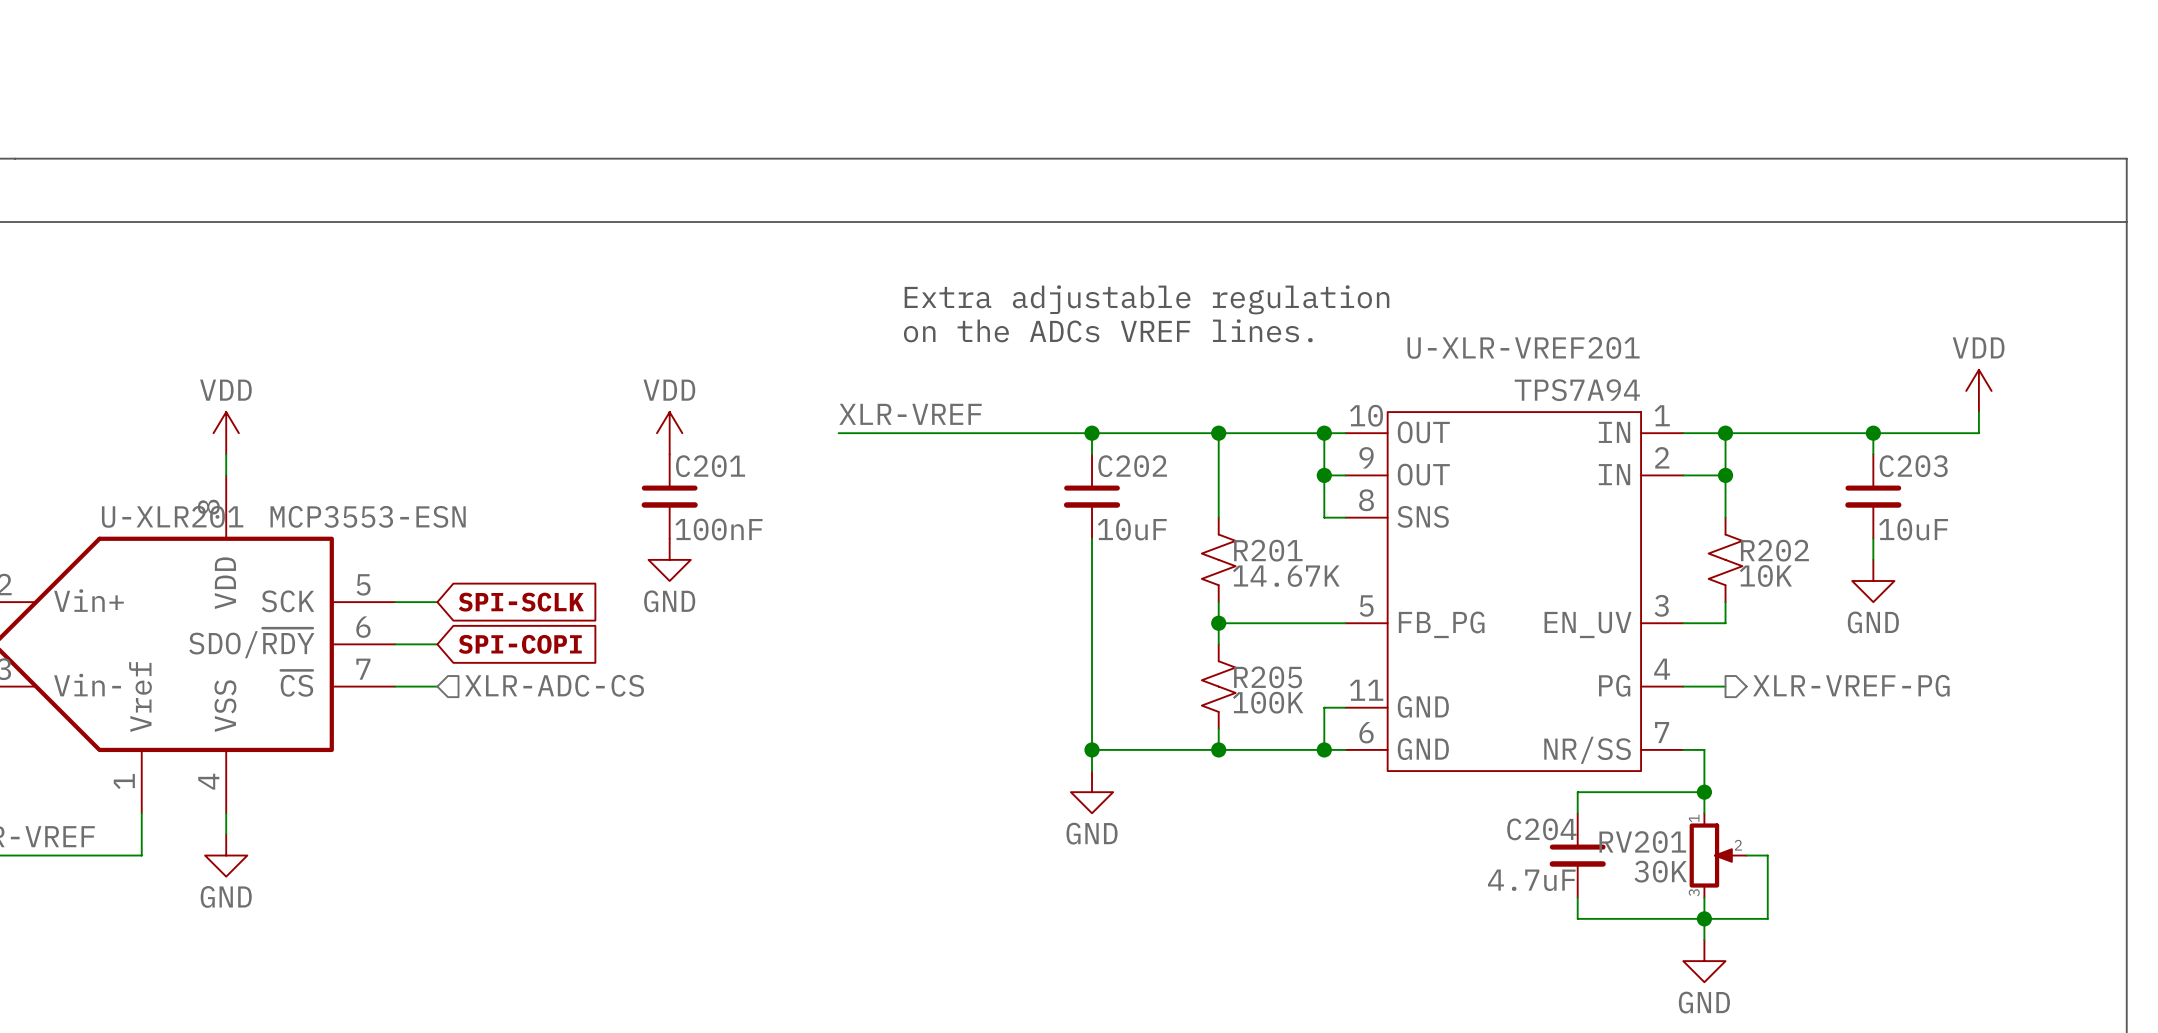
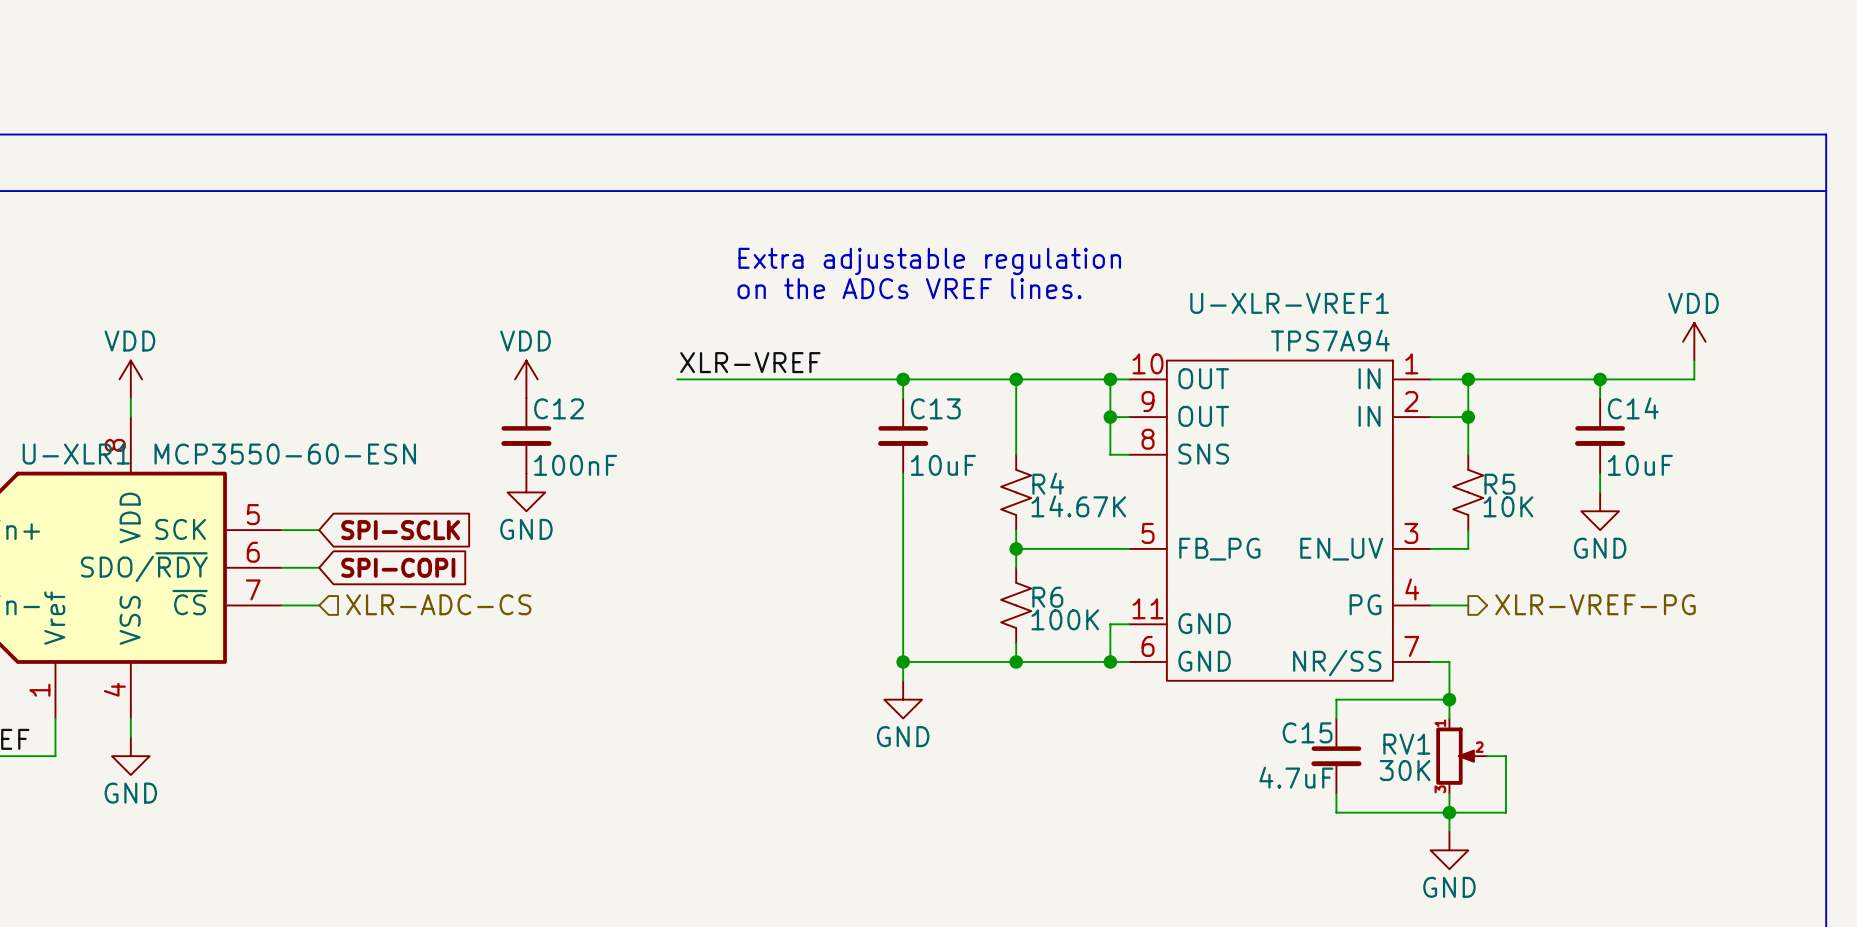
U-XLR-VREF201 name: U-XLR-VREF201 (1523, 347) -> U-XLR-VREF1 (1289, 303)
C201 name: C201 (710, 466) -> C12 (559, 408)
C202 name: C202 (1132, 466) -> C13 (935, 408)
C203 name: C203 (1913, 466) -> C14 (1633, 408)
U-XLR201 name: U-XLR201 (172, 516) -> U-XLR1 (76, 454)
U-XLR201 value: MCP3553-ESN (368, 516) -> MCP3550-60-ESN (285, 454)
R201 name: R201 (1268, 550) -> R4 (1048, 483)
R202 name: R202 (1774, 550) -> R5 (1499, 484)
R205 name: R205 (1268, 677) -> R6 (1047, 597)
C204 name: C204 (1541, 829) -> C15 (1307, 732)
RV201 name: RV201 (1642, 842) -> RV1 (1406, 744)

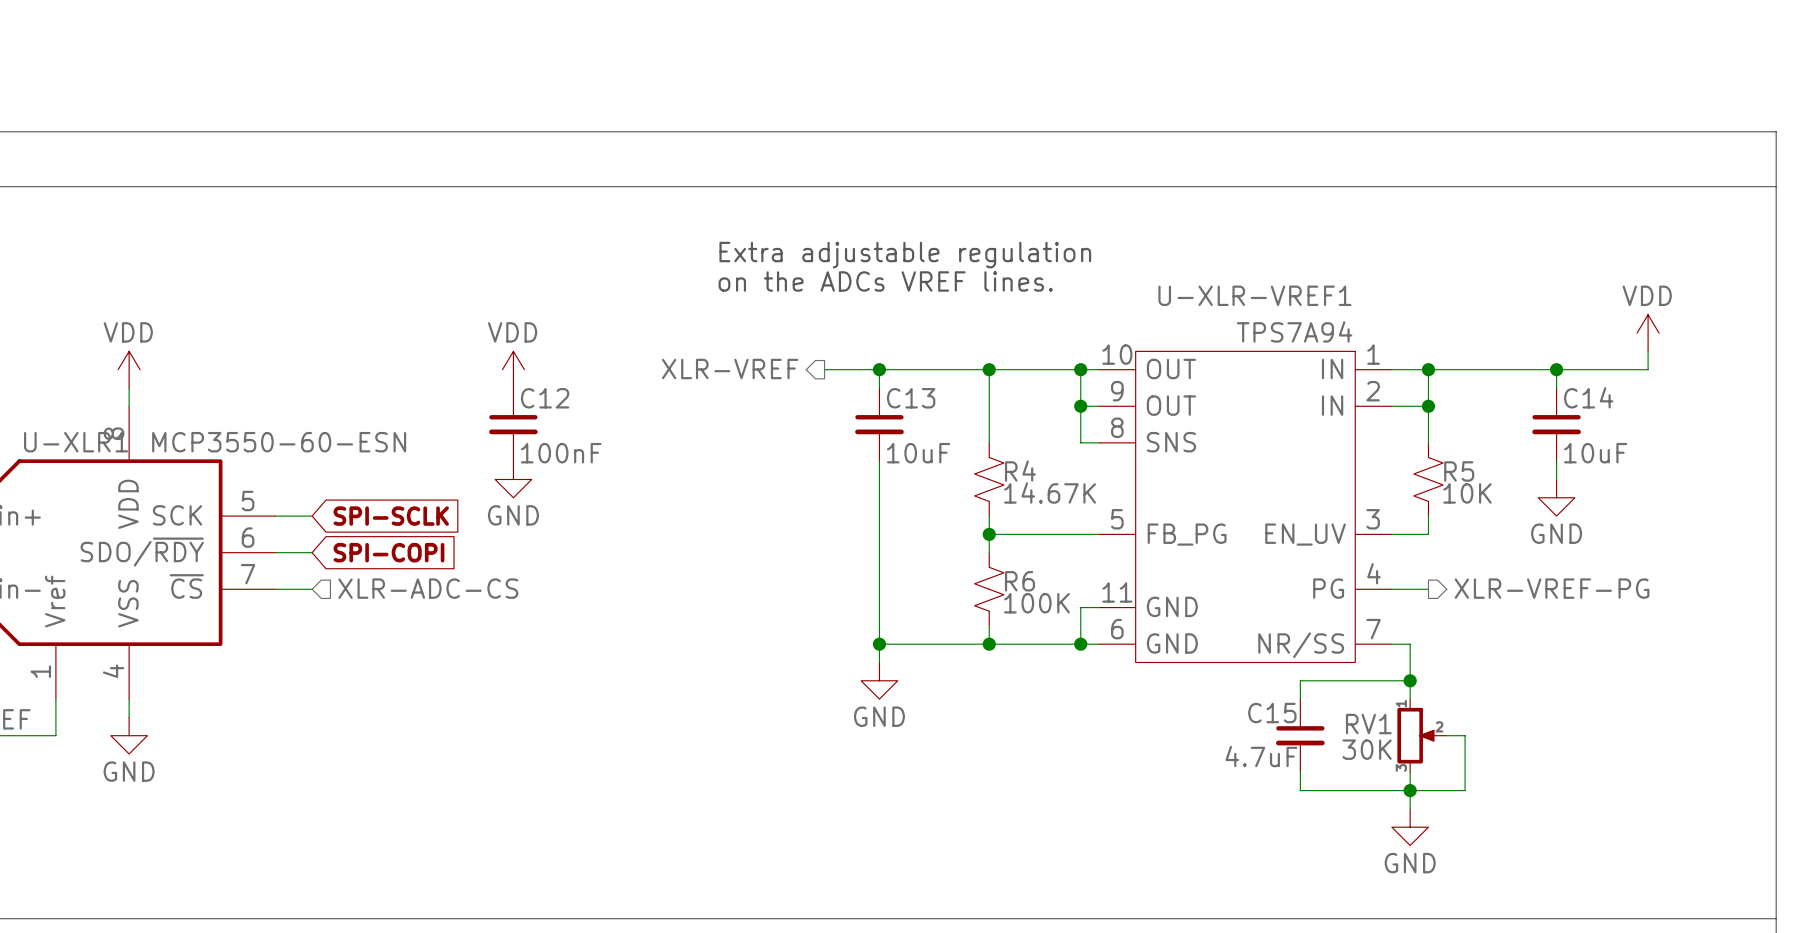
label: XLR-VREF (750, 362) -> none
hierarchical label: none -> XLR-VREF (730, 368)
wire: (677, 379) (846, 379) -> none

